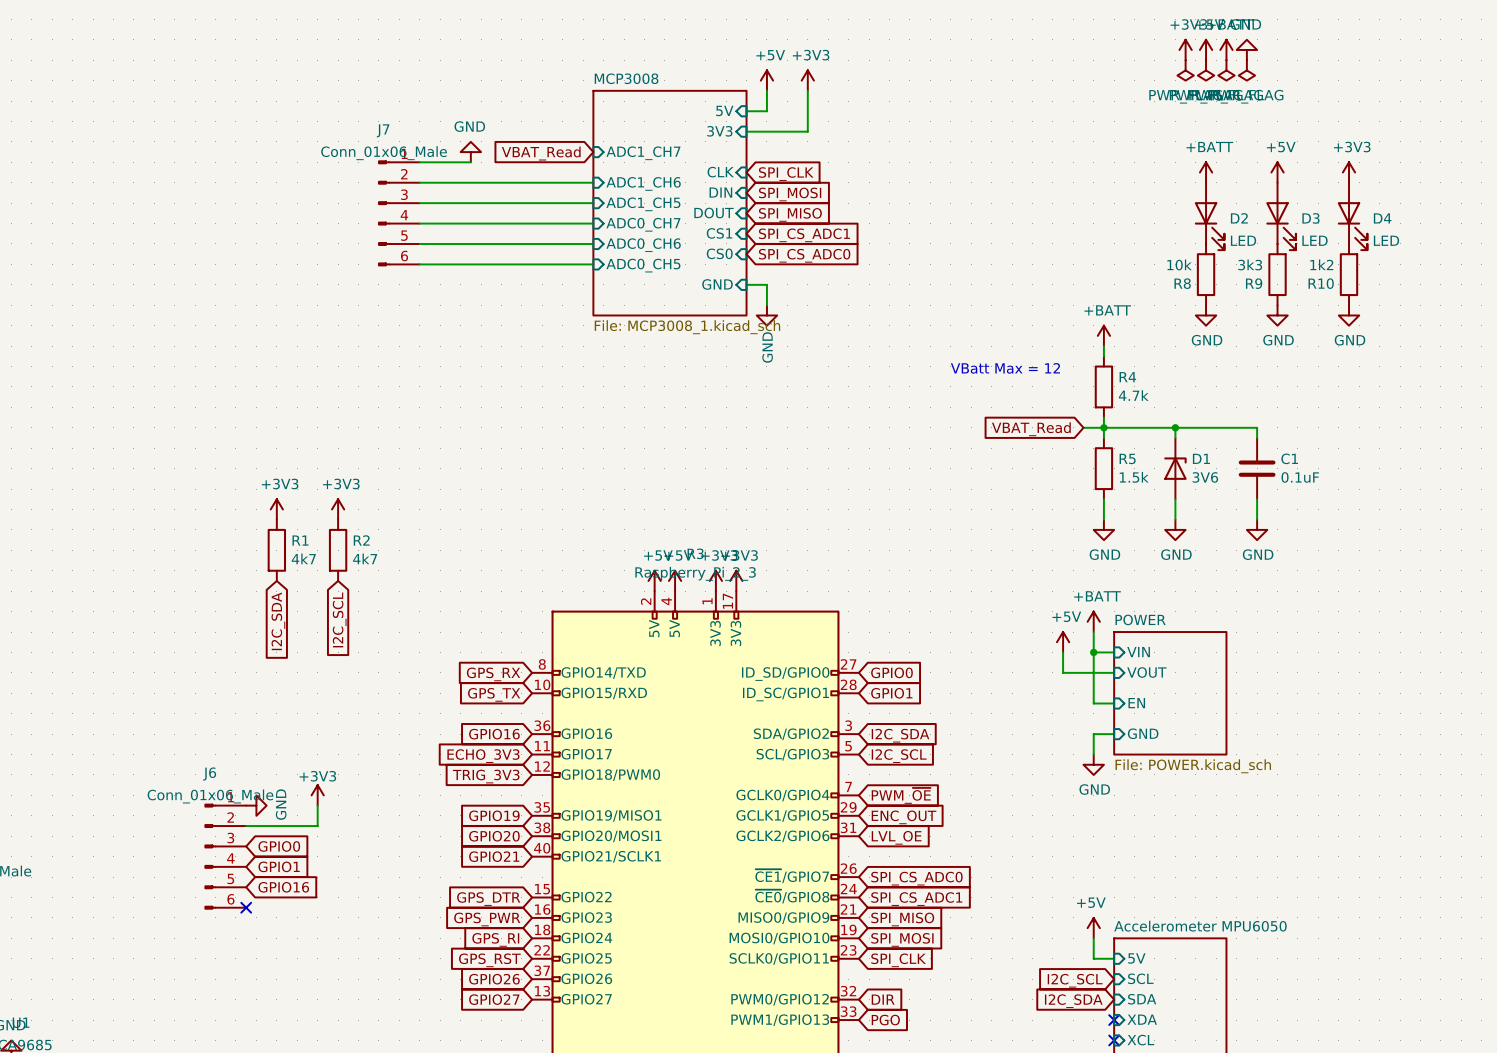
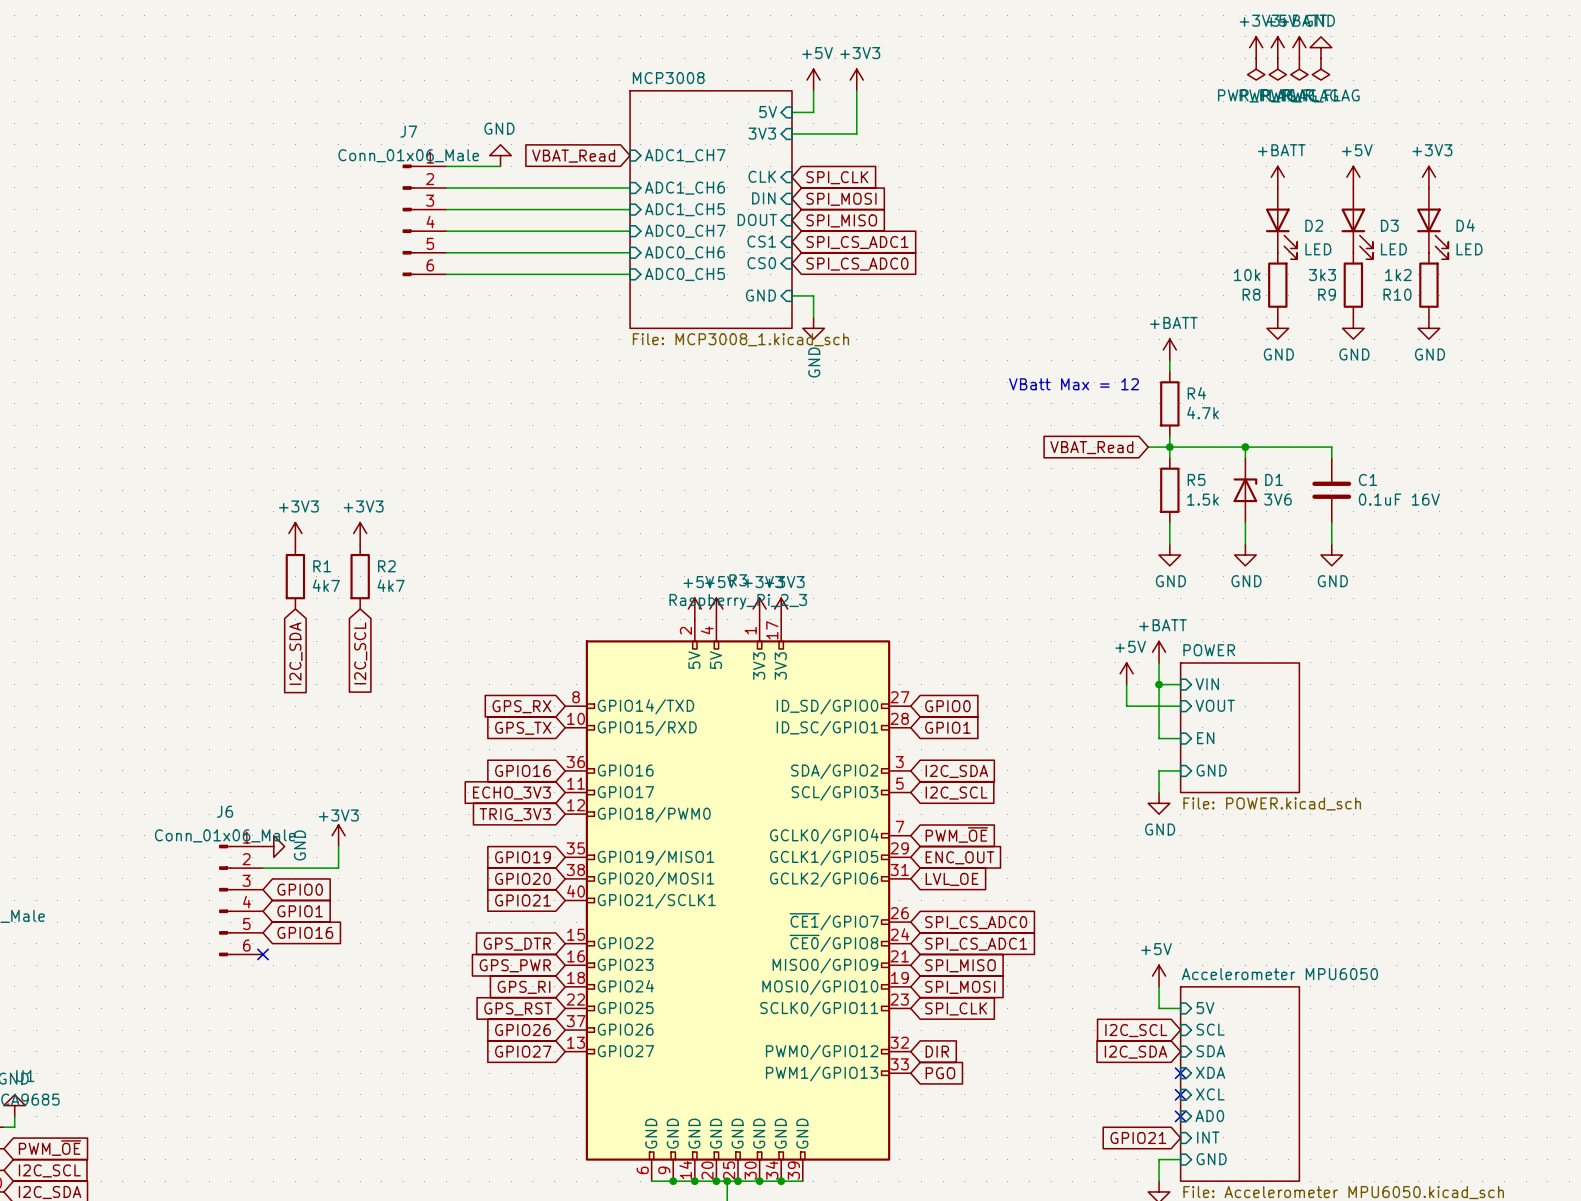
C1 value: 0.1uF (1300, 477) -> 0.1uF 16V (1399, 499)

